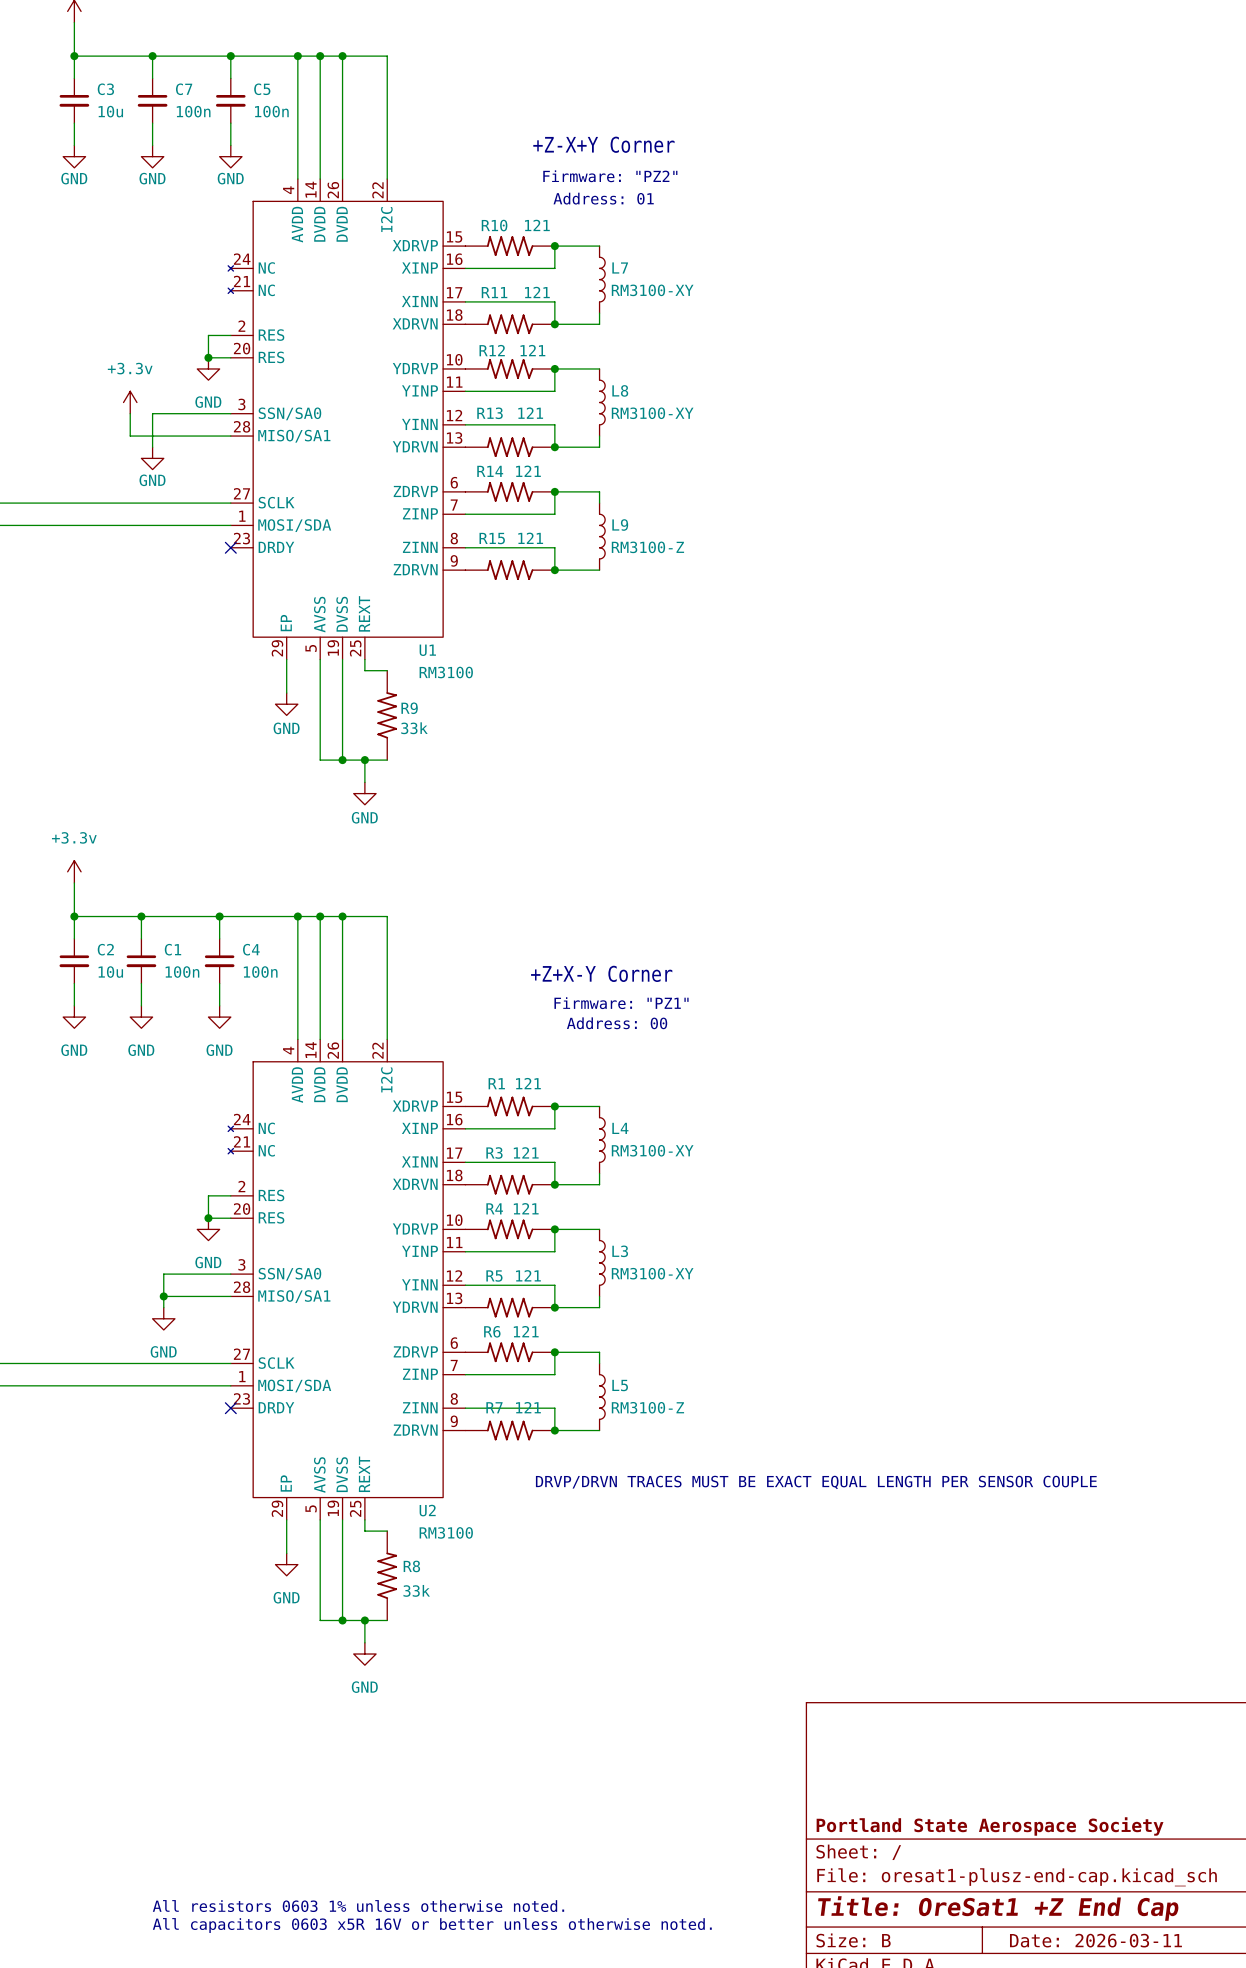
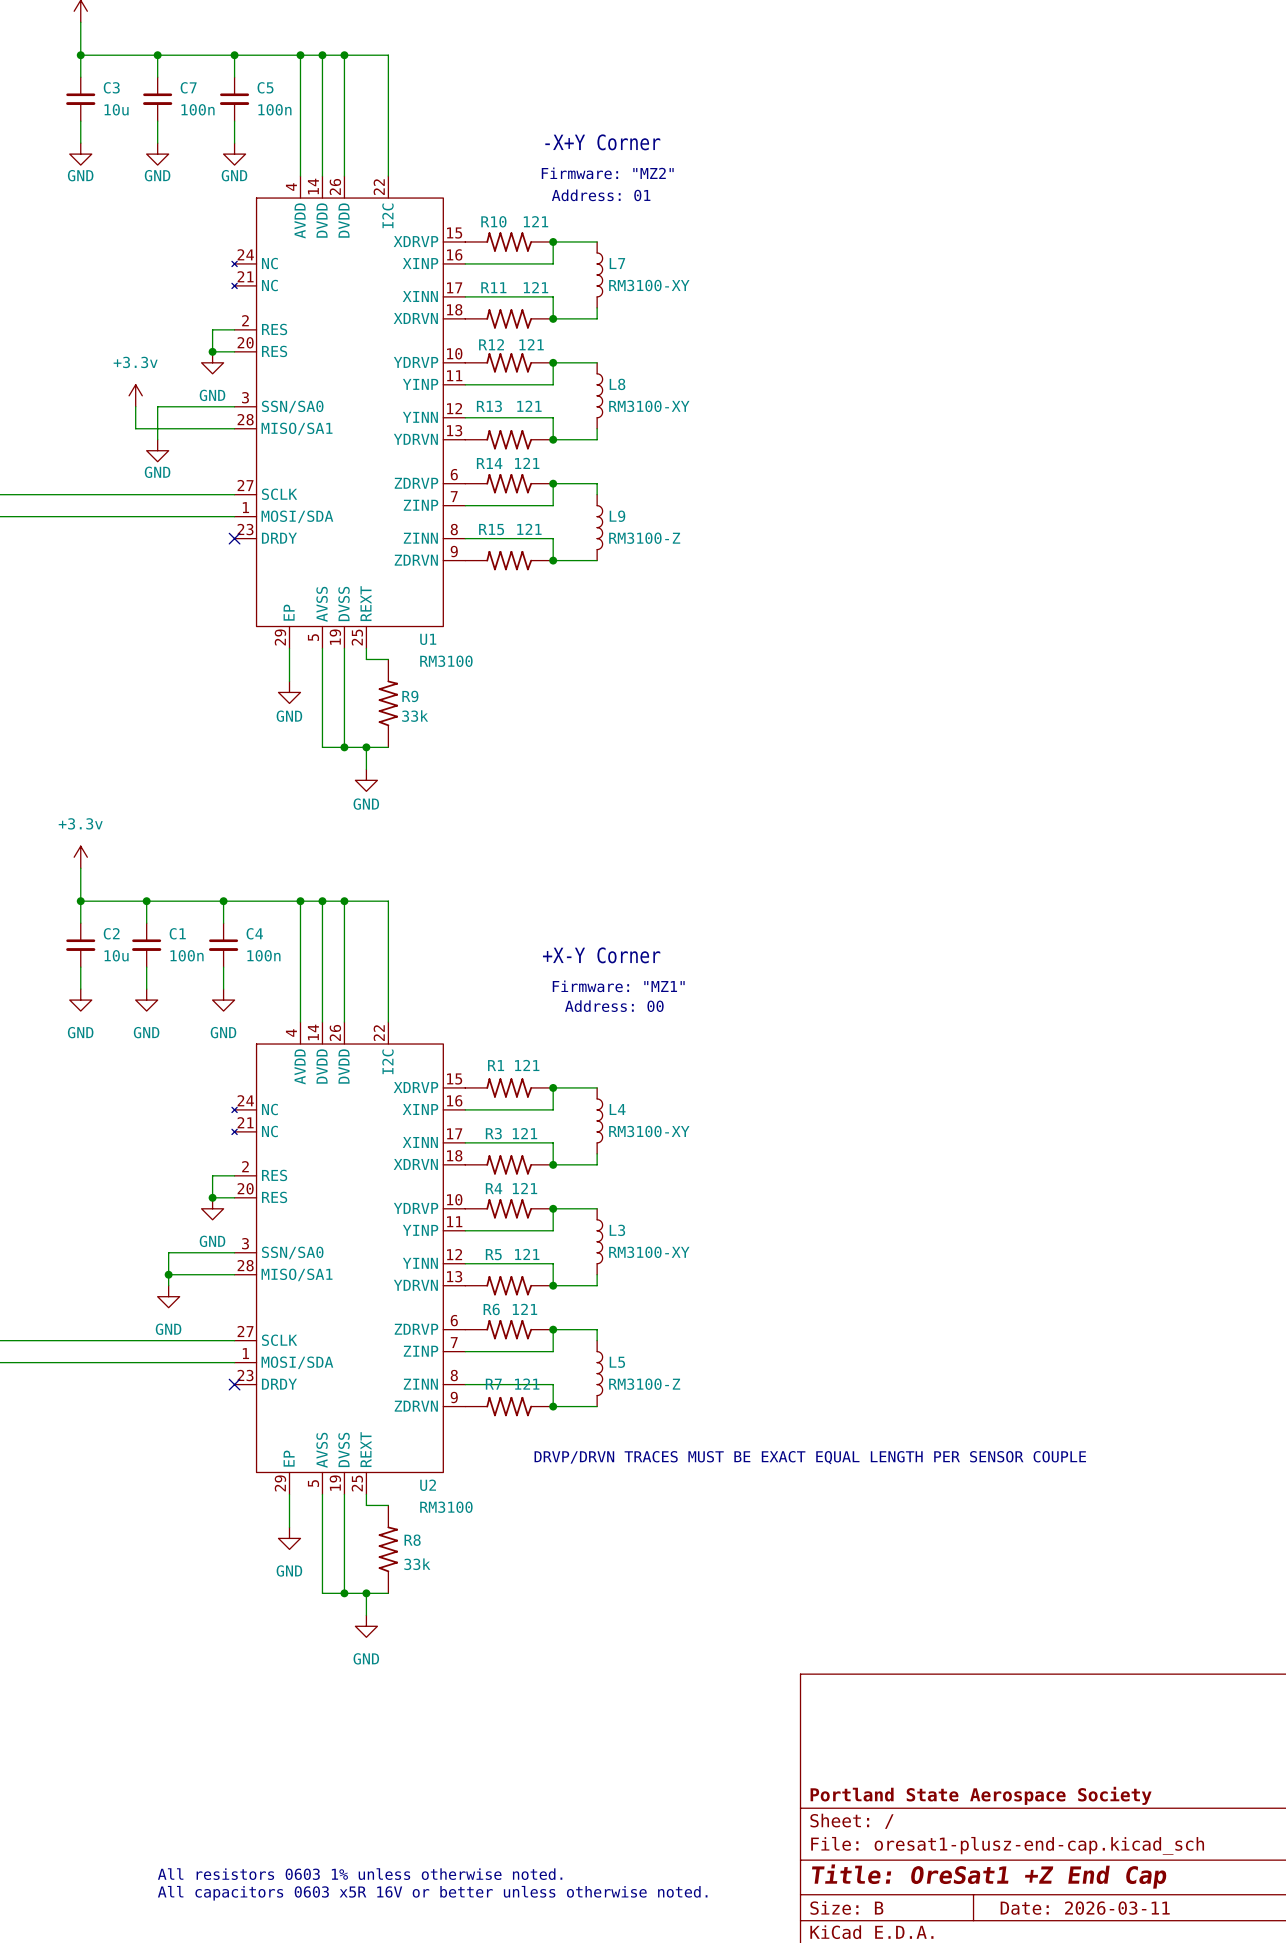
text: +Z-X+Y Corner (603, 144) -> -X+Y Corner (602, 142)
text: Firmware: "PZ2" (610, 176) -> Firmware: "MZ2" (607, 173)
text: +Z+X-Y Corner (601, 973) -> +X-Y Corner (601, 955)
text: Firmware: "PZ1" (621, 1003) -> Firmware: "MZ1" (618, 986)

